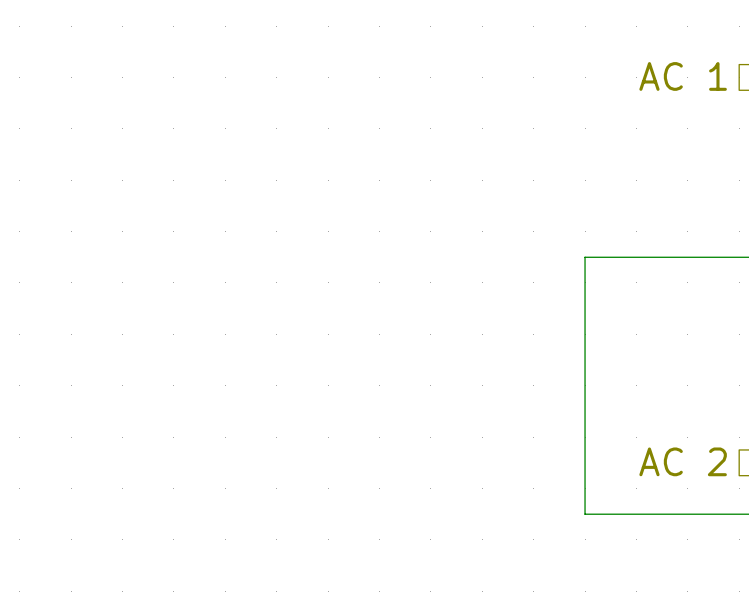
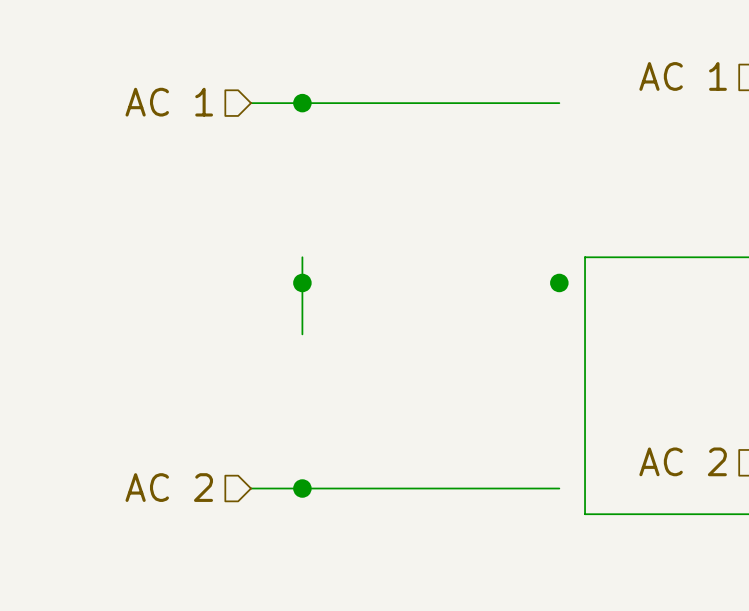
hierarchical label: none -> AC 1 (169, 102)
wire: none -> (251, 103) (559, 103)
junction: none -> (302, 103)
wire: none -> (302, 257) (302, 334)
junction: none -> (302, 282)
junction: none -> (559, 282)
hierarchical label: none -> AC 2 (169, 487)
wire: none -> (251, 488) (559, 488)
junction: none -> (302, 488)

